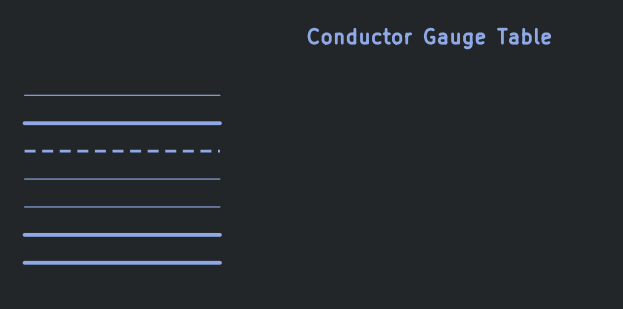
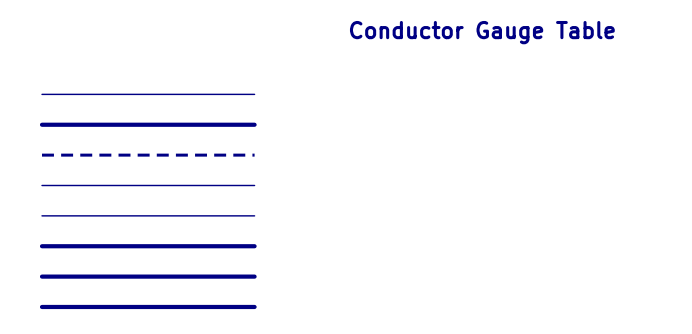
line: none -> (41, 306) (254, 306)

